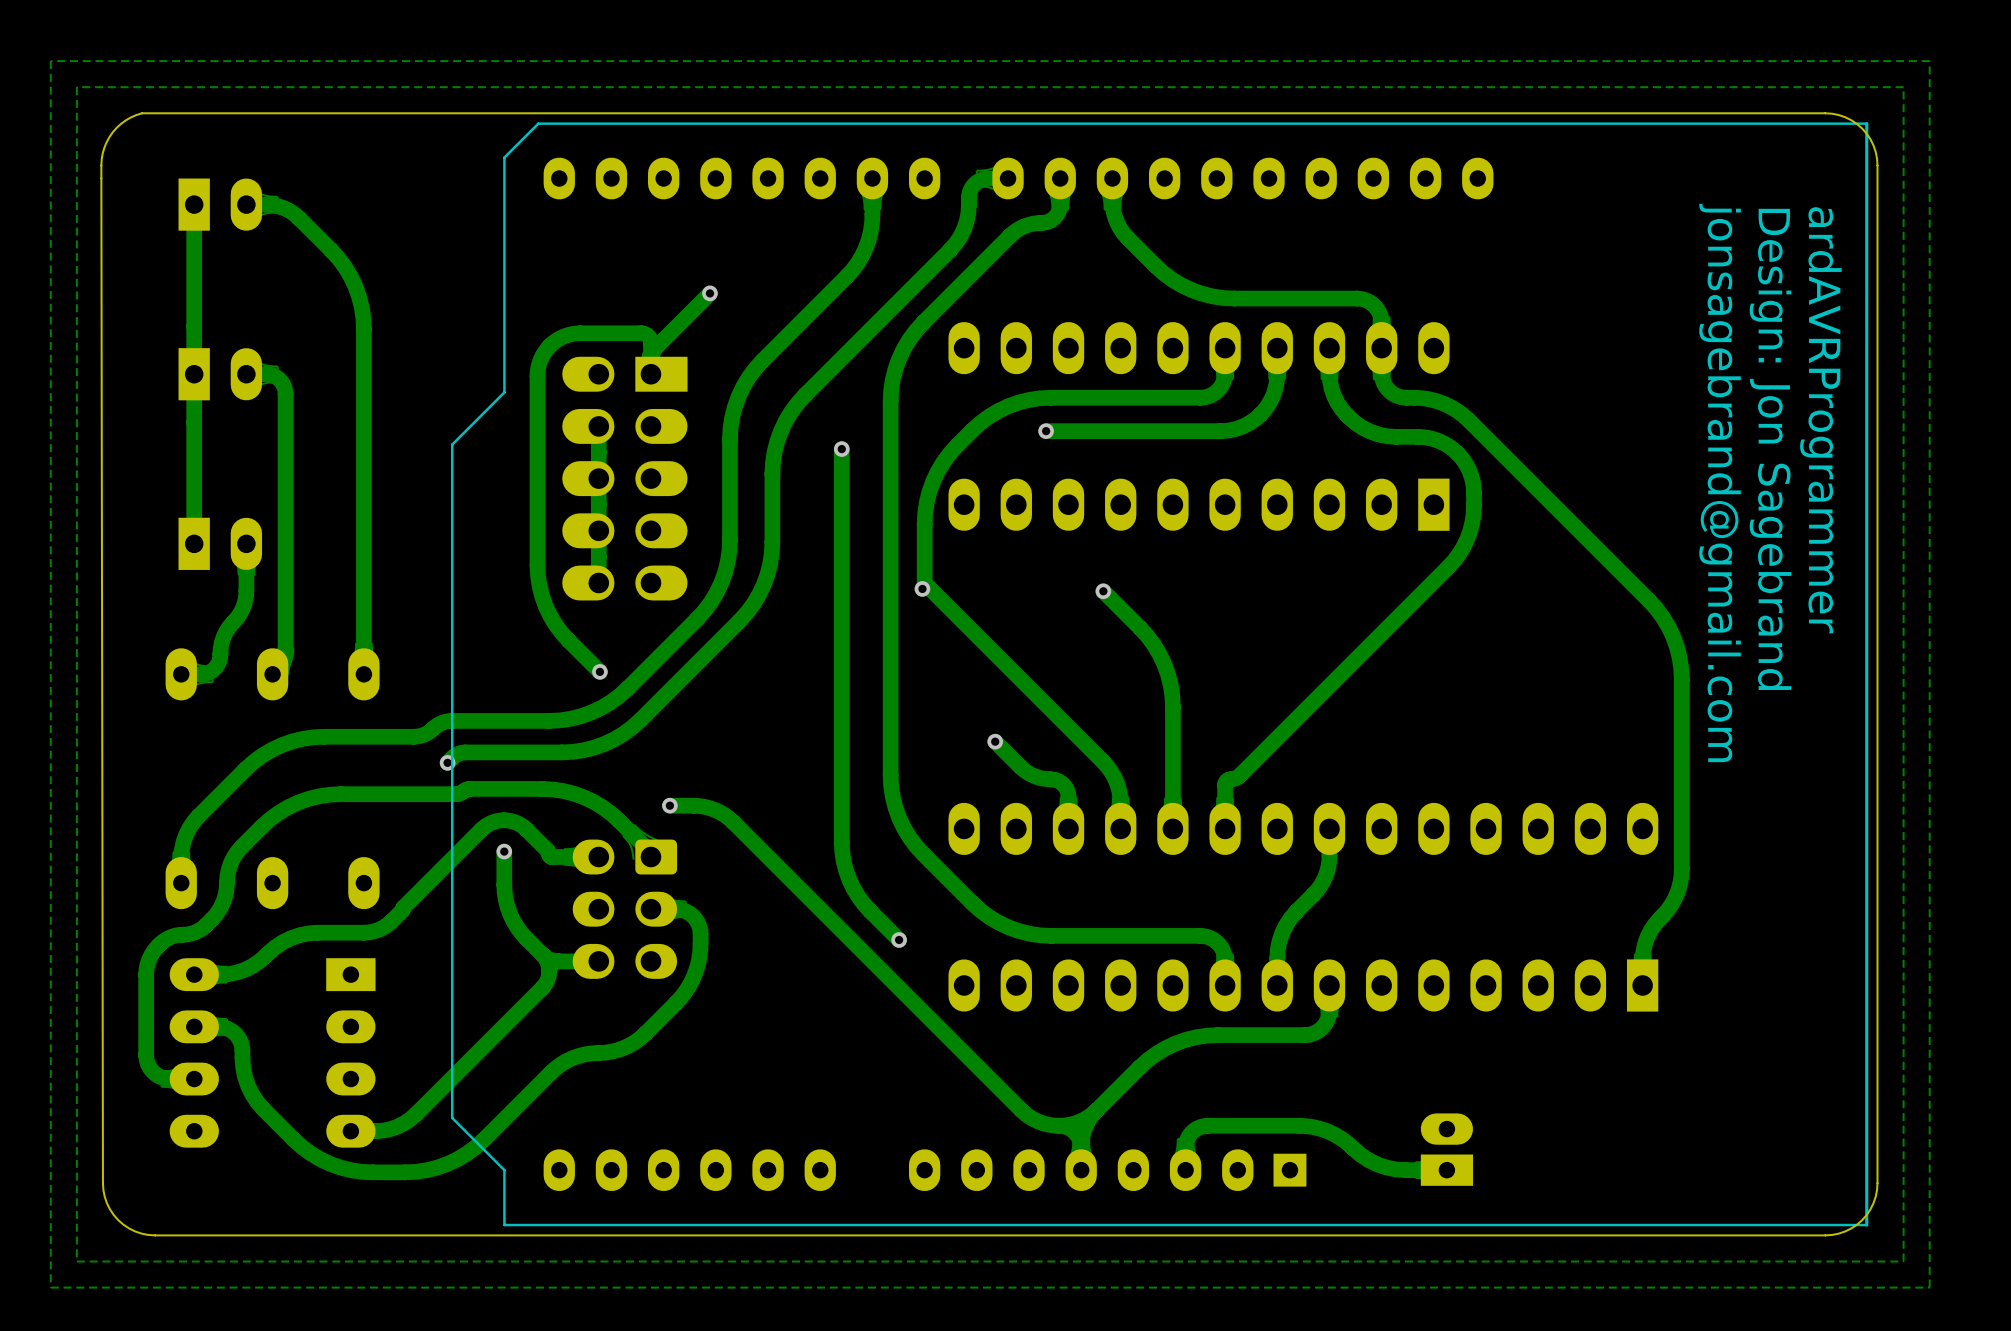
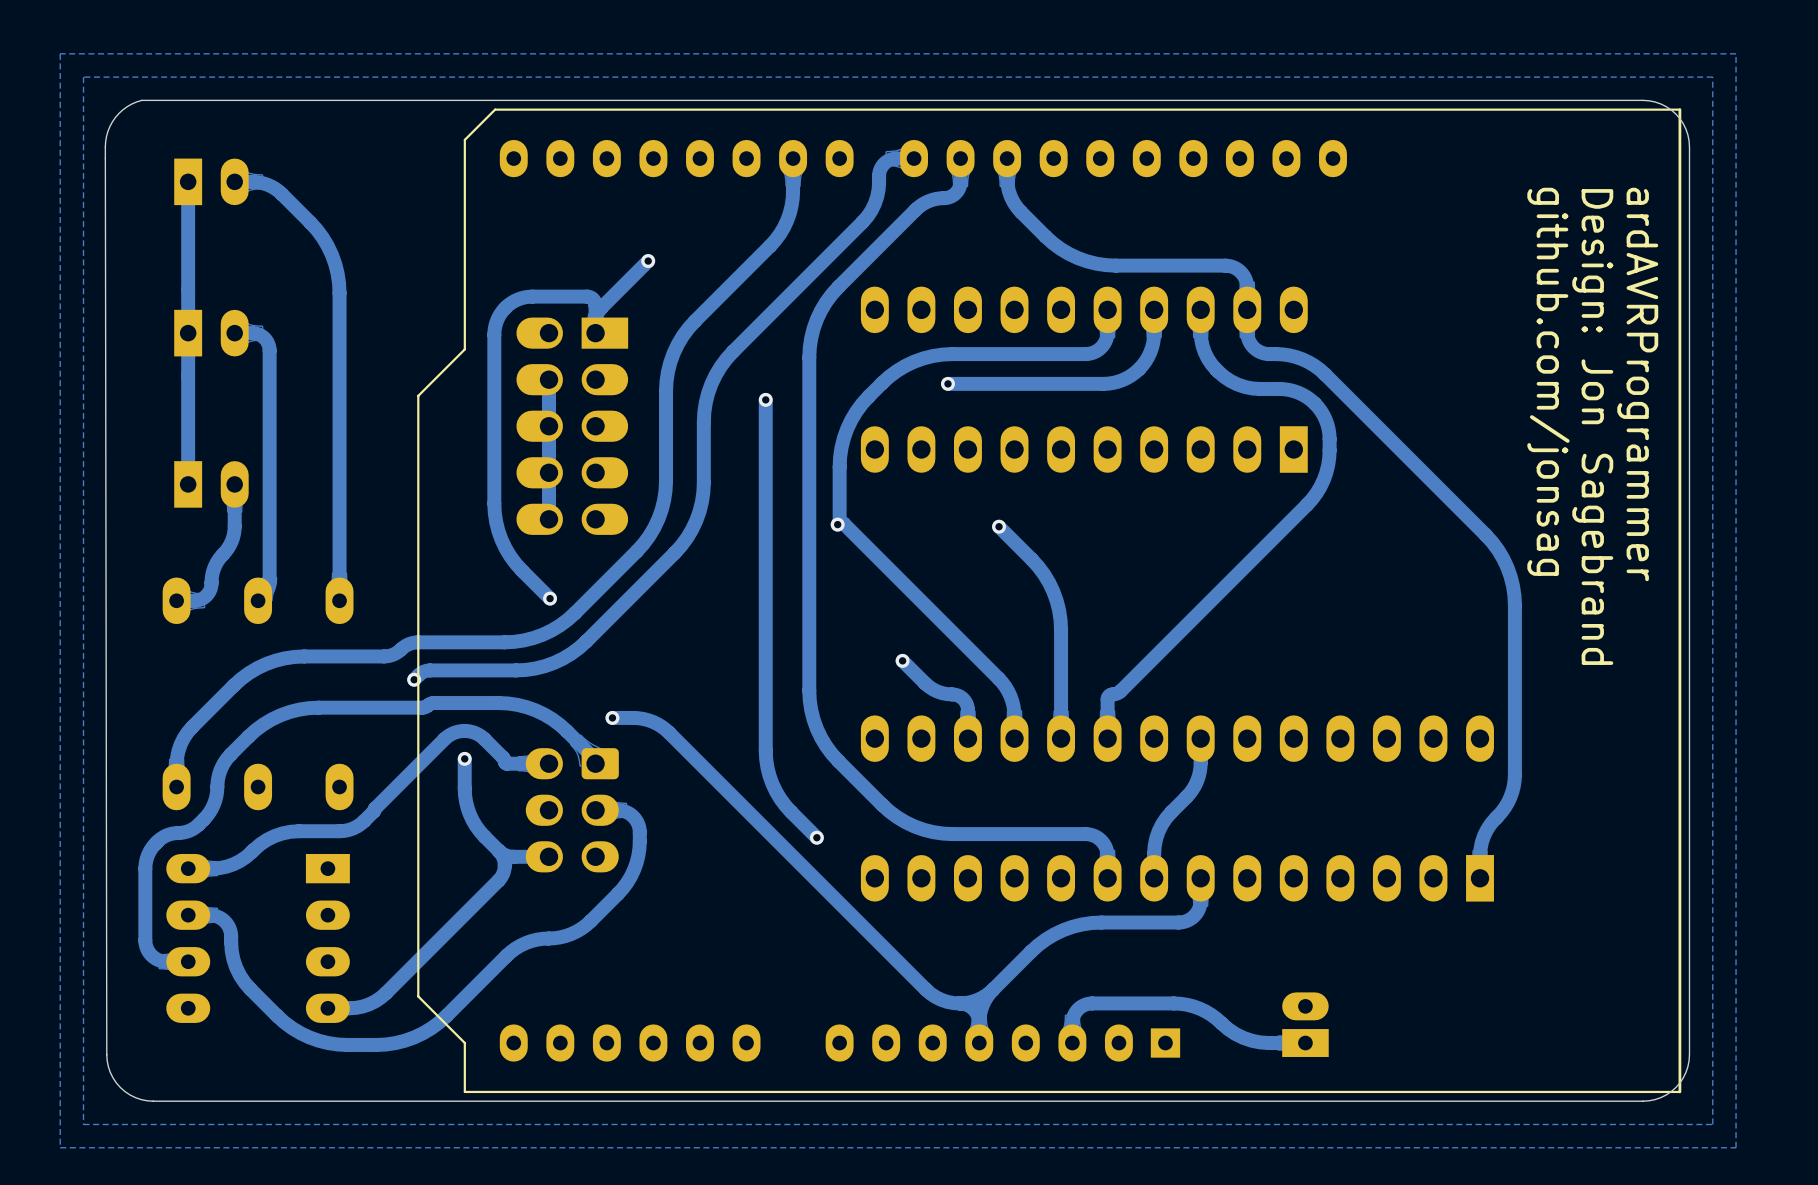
text: jonsagebrand@gmail.com (1720, 482) -> github.com/jonsag (1548, 381)

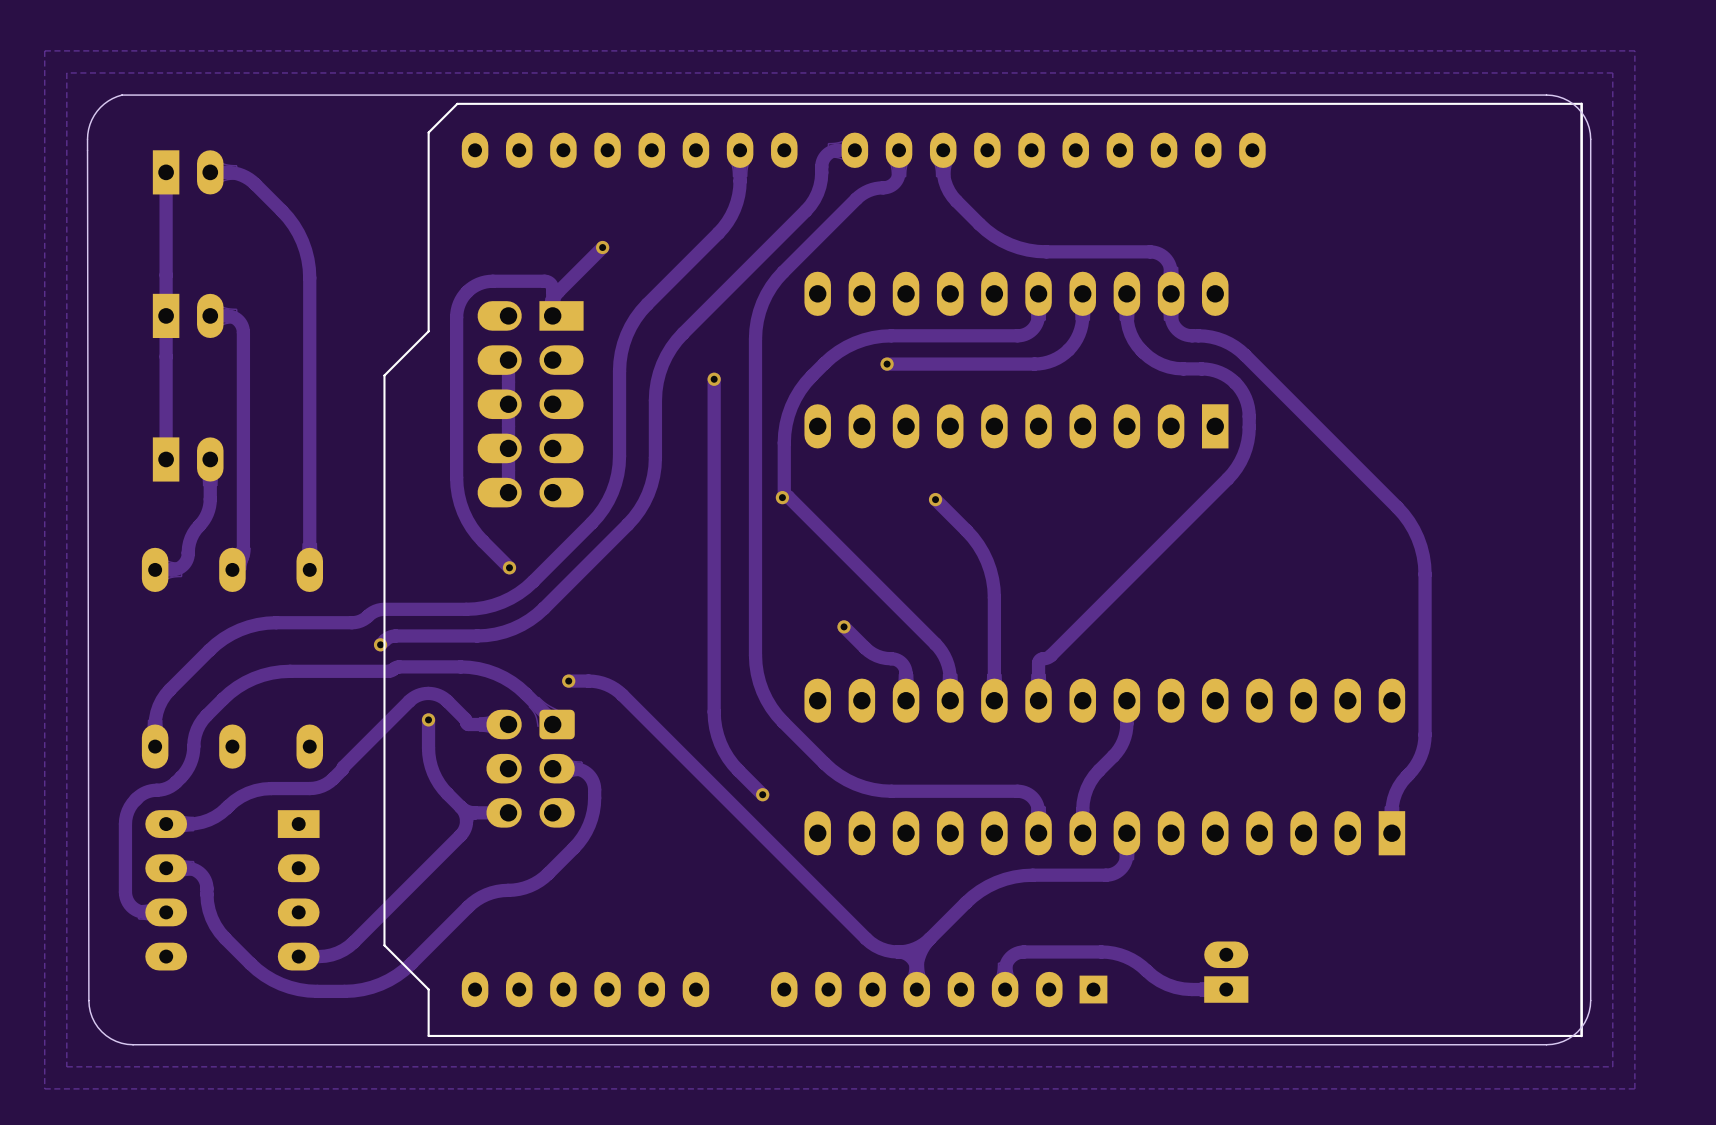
text: github.com/jonsag (1548, 381) -> none
text: ardAVRProgrammer (1637, 384) -> none
text: Design: Jon Sagebrand (1592, 427) -> none

